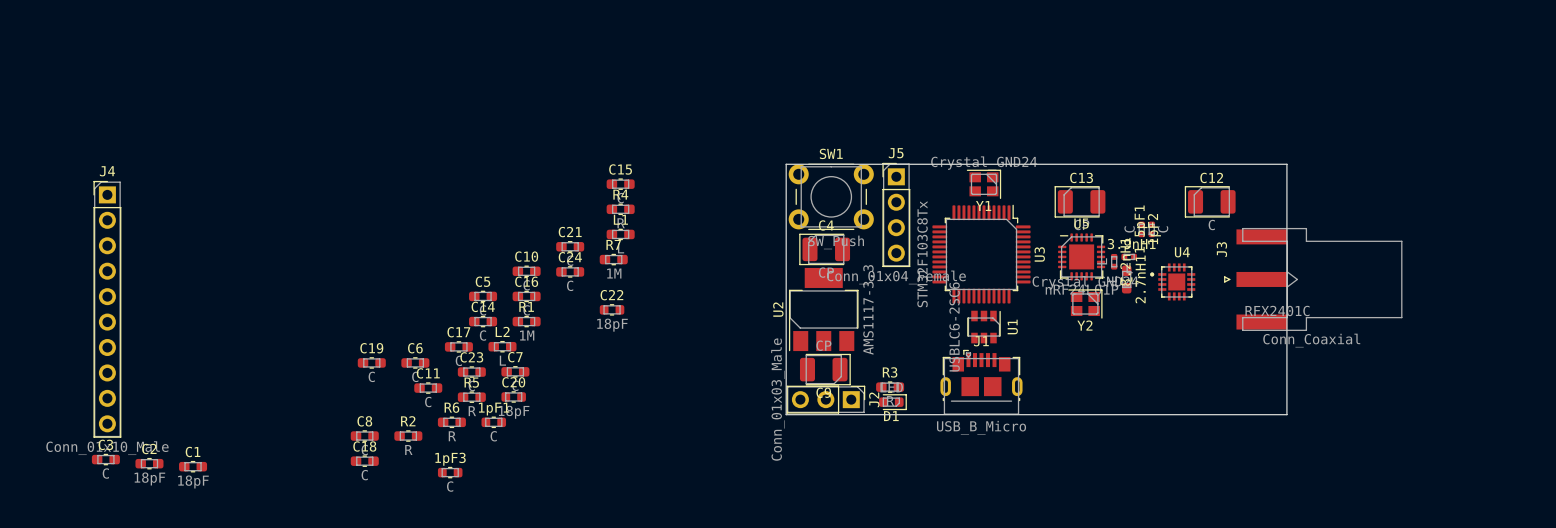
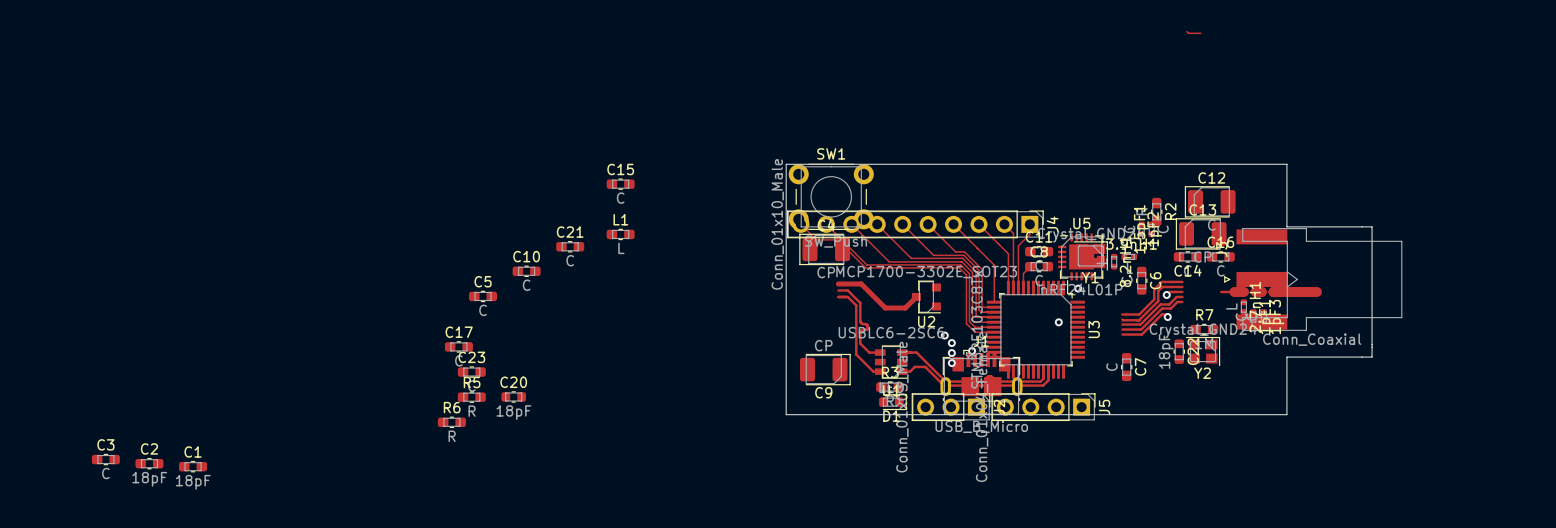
track: none -> (1186, 31) (1188, 33) (1200, 33)
Y1 position: (983, 184) -> (1090, 255)
C13 position: (1080, 201) -> (1201, 233)
R4: R (620, 209) -> none
J5 rotation: 0° (896, 214) -> 90° clockwise (1043, 407)
J5 position: (896, 214) -> (1043, 407)
track: none -> (800, 224) (816, 239) (837, 239) (865, 267) (959, 267) (966, 274) (966, 323) (974, 332) (994, 332)
track: none -> (826, 224) (866, 264) (960, 264) (969, 273) (969, 321) (975, 327) (994, 327)
track: none -> (851, 224) (889, 261) (961, 261) (972, 272) (972, 320) (974, 322) (994, 322)
track: none -> (877, 224) (911, 258) (962, 258) (976, 271) (976, 317) (994, 317)
track: none -> (902, 224) (933, 255) (963, 255) (979, 270) (979, 310) (981, 312) (994, 312)
track: none -> (928, 224) (955, 251) (964, 251) (982, 269) (982, 307) (994, 307)
track: none -> (953, 224) (994, 265) (994, 302)
track: none -> (978, 224) (1008, 253) (1008, 288)
track: none -> (1004, 224) (1013, 233) (1013, 288)
track: none -> (1029, 224) (1029, 234) (1018, 245) (1018, 288)
board edge: (1286, 226) (1286, 357) -> (1286, 226) (1372, 226) (1372, 357) (1286, 357)
U3 position: (981, 254) -> (1035, 329)
R7 position: (613, 259) -> (1204, 329)
2.7nH1 footprint: [1120, 265, 1133, 294] -> [1240, 299, 1248, 315]
track: none -> (1030, 266) (1023, 273) (1023, 288)
U2 footprint: [789, 267, 859, 352] -> [911, 280, 942, 314]
C24: C (570, 271) -> none
U4: RFX2401C (1172, 281) -> none
track: none -> (1182, 281) (1161, 281) (1154, 289) (1154, 299) (1139, 314) (1122, 314)
track: none -> (838, 283) (861, 283) (885, 308) (905, 308) (916, 296)
track: none -> (1182, 286) (1162, 286) (1158, 291) (1158, 301) (1139, 320) (1122, 319)
via: none -> (1078, 288)
track: none -> (838, 290) (847, 290) (860, 302) (860, 321) (867, 327) (860, 331) (860, 343) (869, 352) (880, 352)
track: none -> (1182, 291) (1169, 291) (1166, 294)
track: none -> (1221, 291) (1244, 291)
track: none -> (1255, 291) (1262, 291)
track: none -> (1316, 291) (1273, 291) (1281, 292)
via: none -> (1166, 294)
C16 position: (526, 296) -> (1220, 256)
track: none -> (838, 296) (847, 296) (856, 305) (856, 354) (873, 371) (880, 371)
track: none -> (1182, 296) (1176, 296) (1169, 304) (1160, 304) (1140, 324) (1122, 324)
track: none -> (1182, 301) (1177, 301) (1170, 308) (1162, 308) (1141, 329) (1122, 329)
Y2 position: (1085, 304) -> (1203, 351)
C14 name position: C14 (483, 306) -> C14 (1188, 270)
J4 rotation: 0° (107, 309) -> 90° clockwise (915, 224)
J4 position: (107, 309) -> (915, 224)
C22 rotation: 0° (612, 309) -> 90° clockwise (1179, 351)
C22 position: (612, 309) -> (1179, 351)
U2 name position: U2 (778, 309) -> U2 (926, 321)
U2 value: AMS1117-3.3 (868, 309) -> MCP1700-3302E_SOT23 (926, 272)
track: none -> (1169, 314) (1161, 314) (1141, 334) (1122, 334)
via: none -> (1167, 317)
C14 position: (483, 321) -> (1187, 256)
R1: 1M (526, 321) -> none
via: none -> (1058, 322)
U1 rotation: 0° (983, 327) -> 90° clockwise (891, 362)
U1 position: (983, 327) -> (891, 362)
via: none -> (944, 335)
via: none -> (951, 343)
L2: L (502, 346) -> none
via: none -> (972, 350)
track: none -> (902, 352) (916, 352) (945, 381) (984, 381) (989, 376) (995, 381) (1040, 381) (1043, 378) (1043, 371)
via: none -> (951, 353)
C19: C (371, 362) -> none
C6 rotation: 0° (415, 362) -> 90° clockwise (1141, 280)
C6 position: (415, 362) -> (1141, 280)
via: none -> (951, 363)
track: none -> (903, 370) (902, 371) (910, 371) (914, 366) (925, 366) (943, 385) (1043, 385) (1048, 380) (1048, 371)
C7 rotation: 0° (515, 371) -> 90° clockwise (1126, 367)
C7 position: (515, 371) -> (1126, 367)
C11 position: (428, 388) -> (1039, 251)
J2 position: (825, 399) -> (951, 407)
1pF1 footprint: [481, 416, 507, 429] -> [1250, 309, 1257, 325]
C8 position: (364, 436) -> (1039, 266)
R2 rotation: 0° (408, 436) -> 90° clockwise (1156, 211)
R2 position: (408, 436) -> (1156, 211)
C18: C (364, 461) -> none
1pF3 footprint: [437, 466, 463, 479] -> [1260, 309, 1268, 325]

